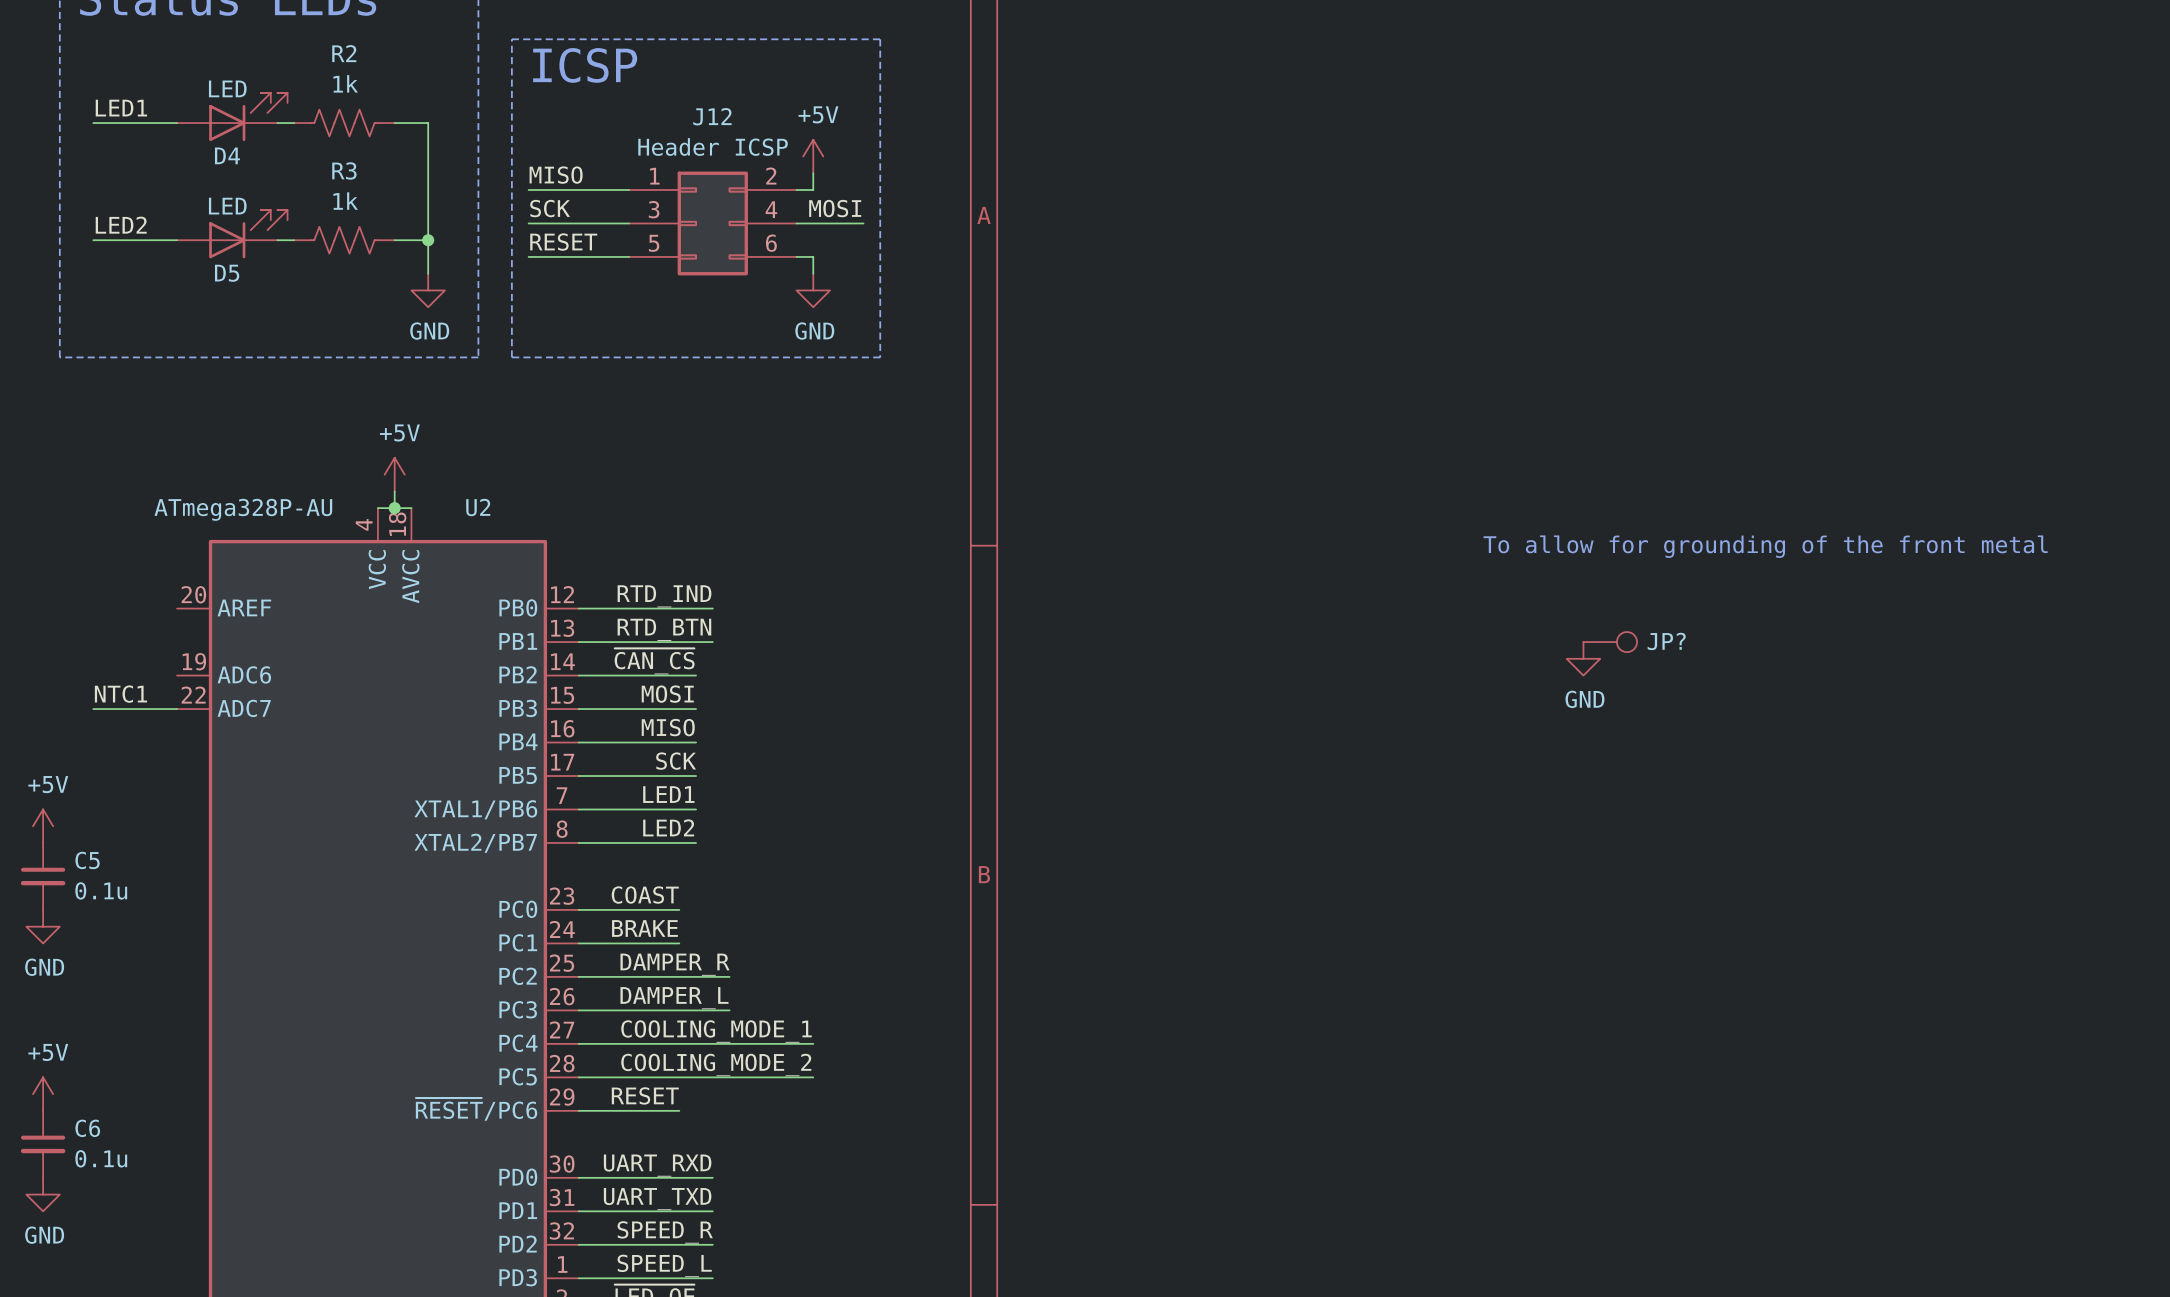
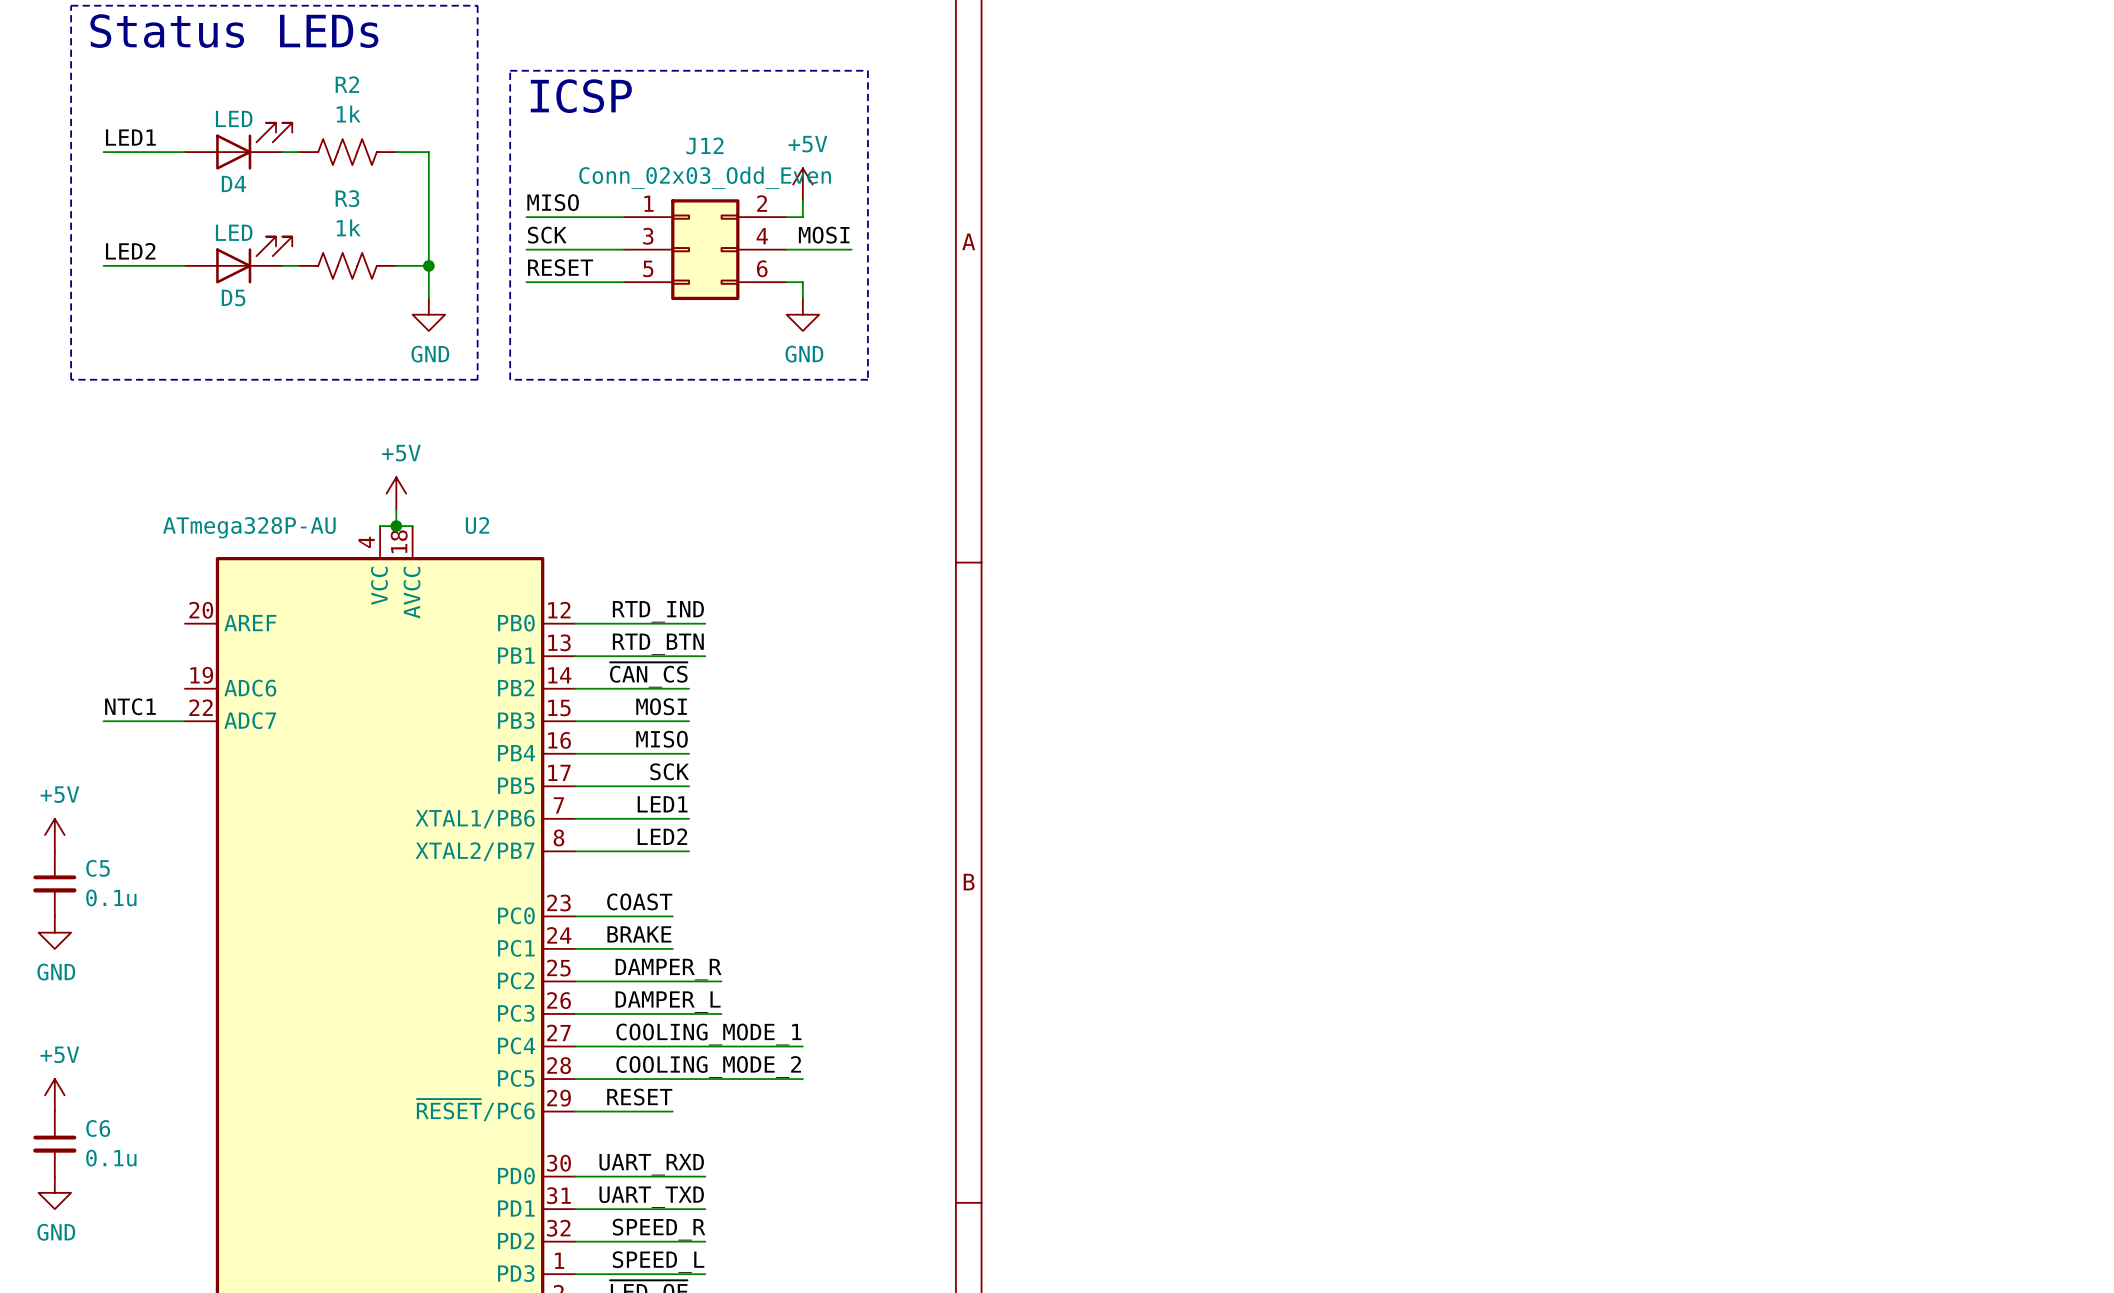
J12 value: Header ICSP (713, 146) -> Conn_02x03_Odd_Even (705, 177)
text: To allow for grounding of the front metal (1765, 546) -> none
JP?: (1610, 642) -> none
power symbol: GND (1583, 658) -> none

